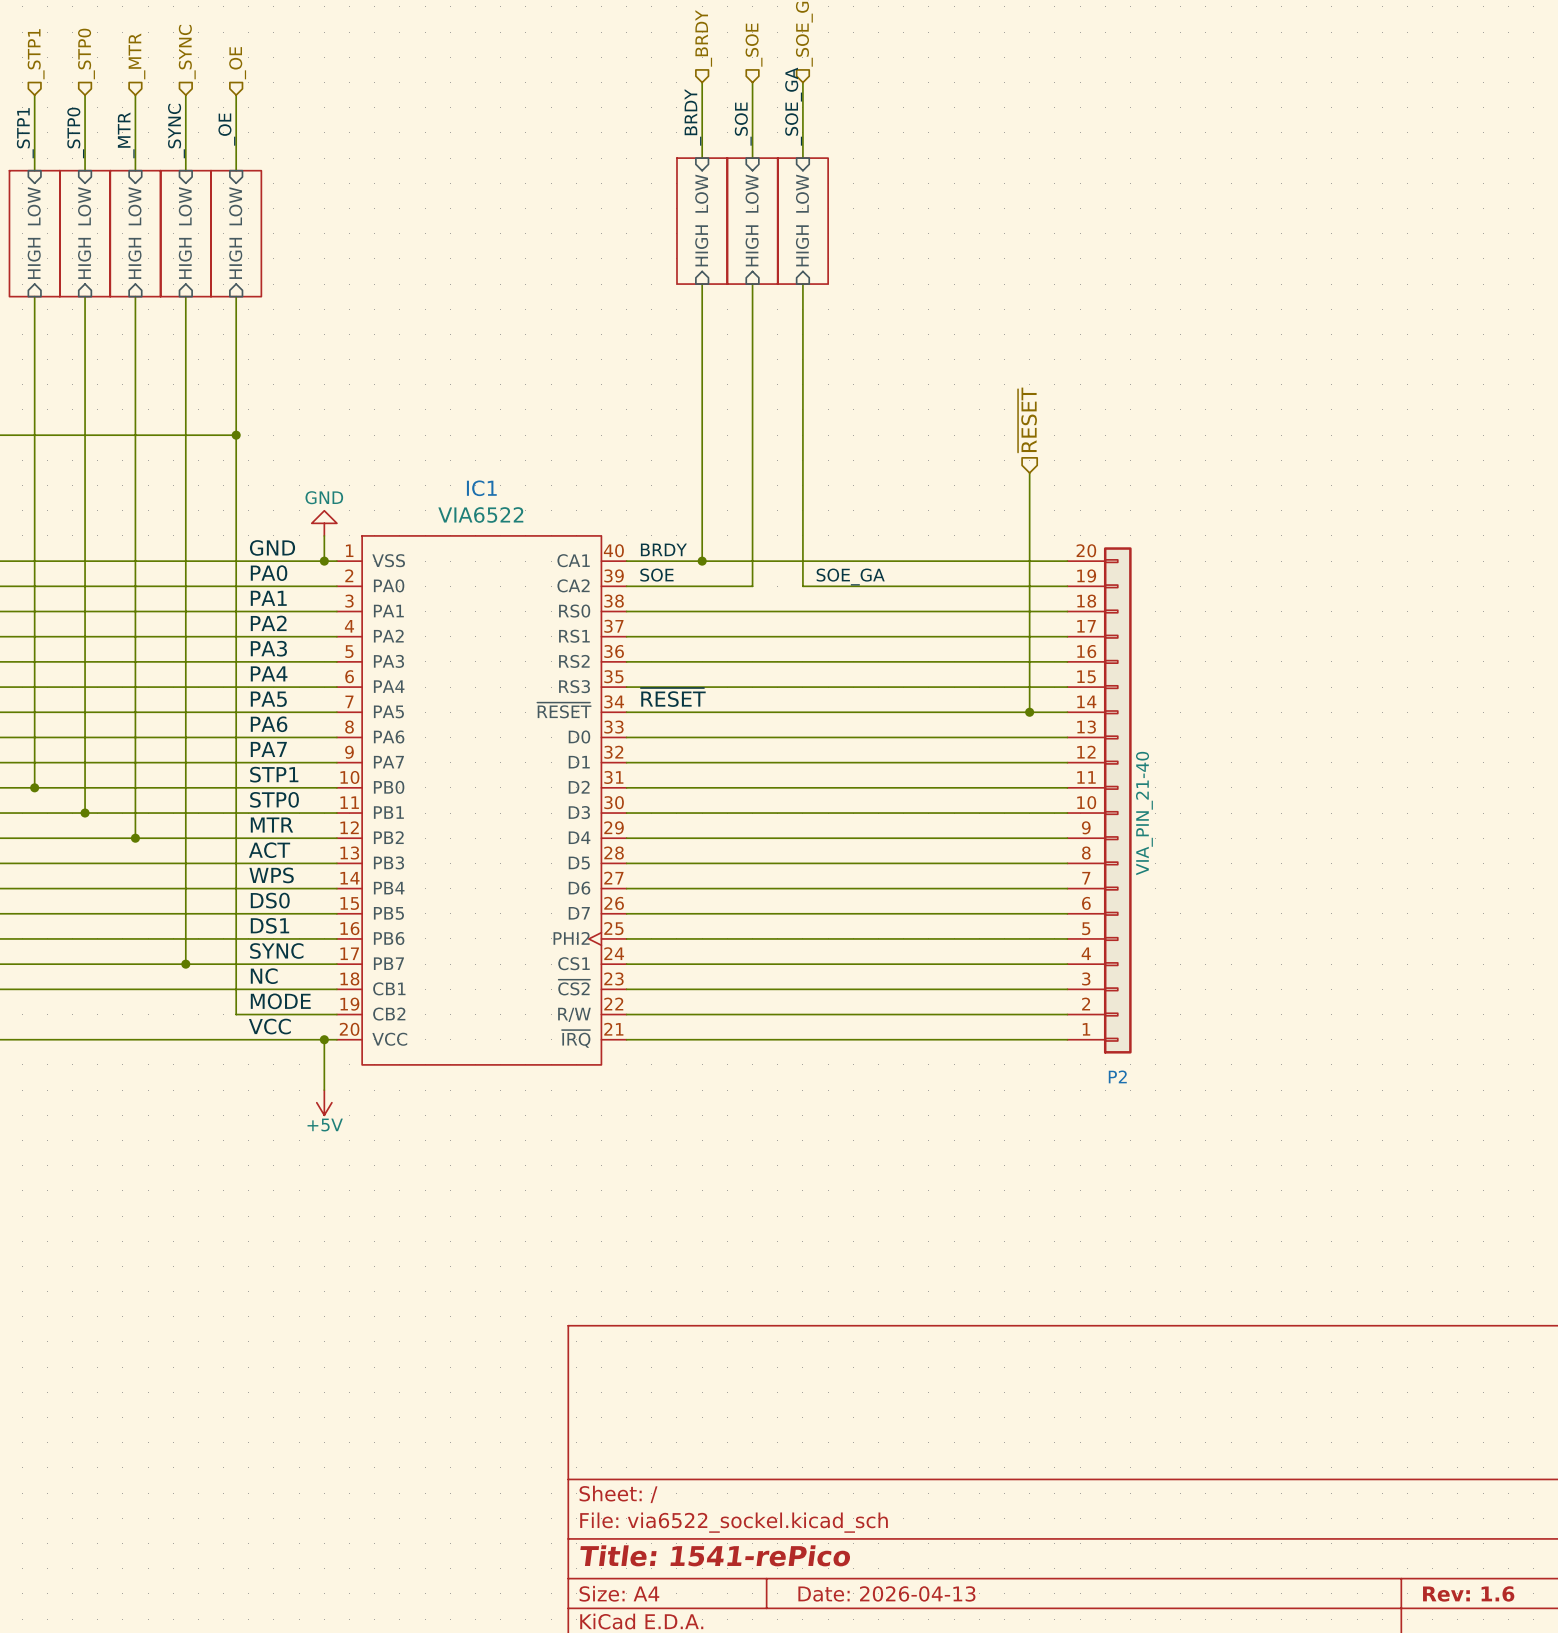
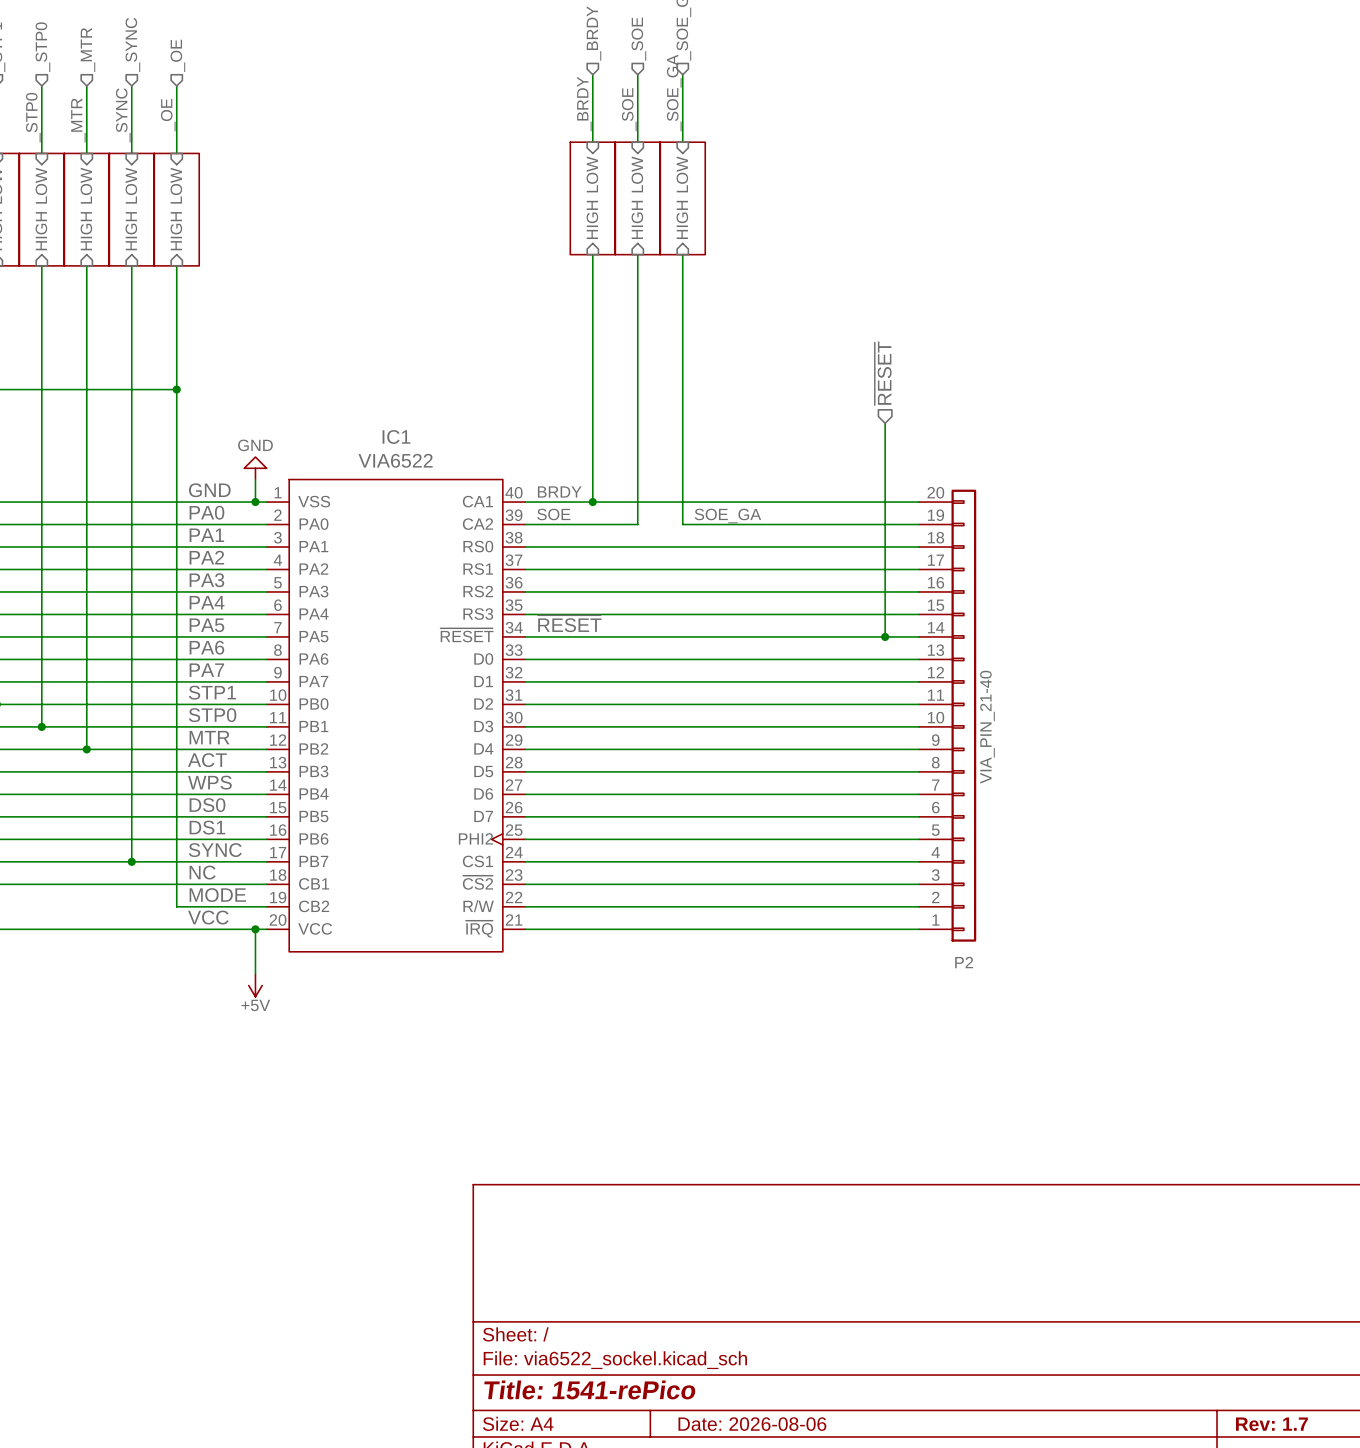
title block: Date: 2026-04-13 (886, 1593) -> Date: 2026-08-06 (752, 1424)
title block: Rev: 1.6 (1468, 1593) -> Rev: 1.7 (1271, 1424)

